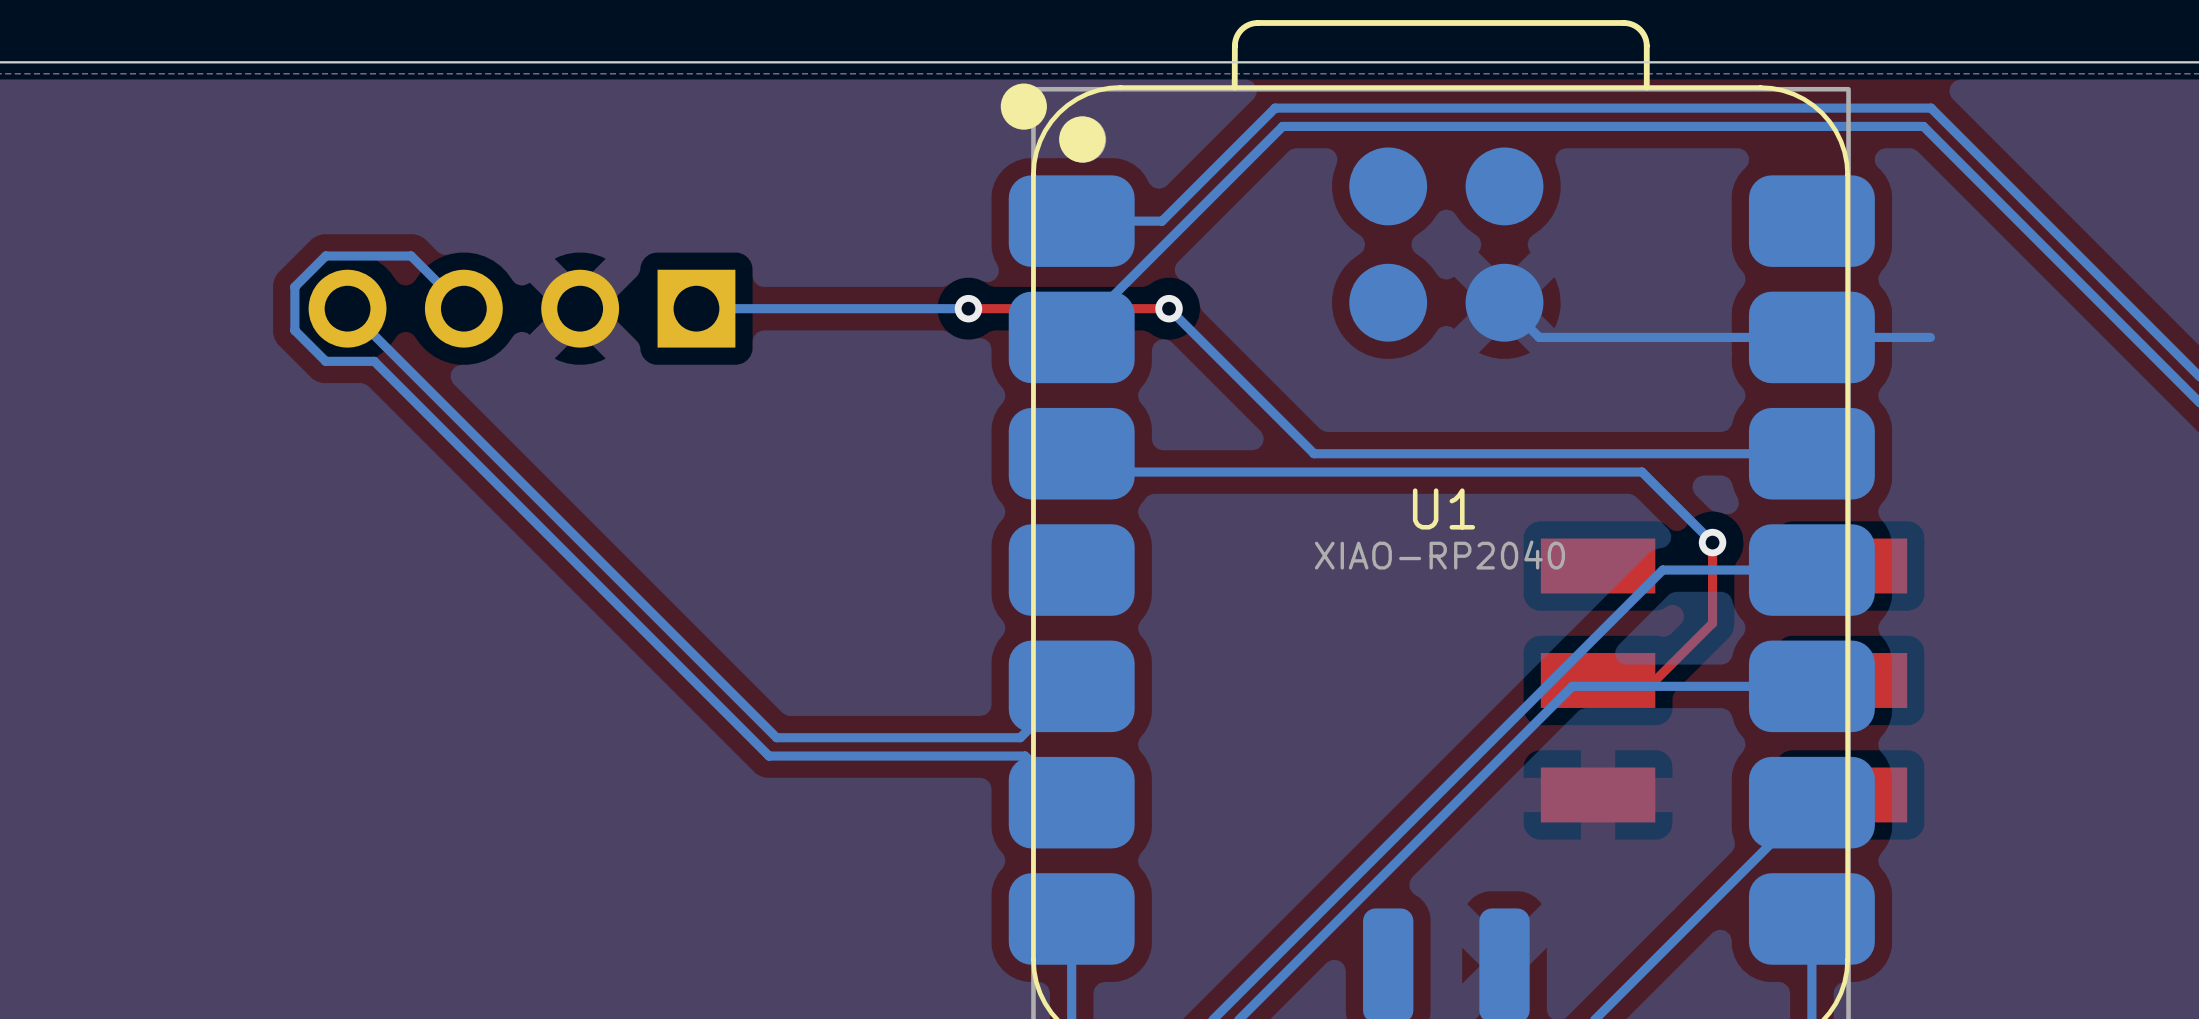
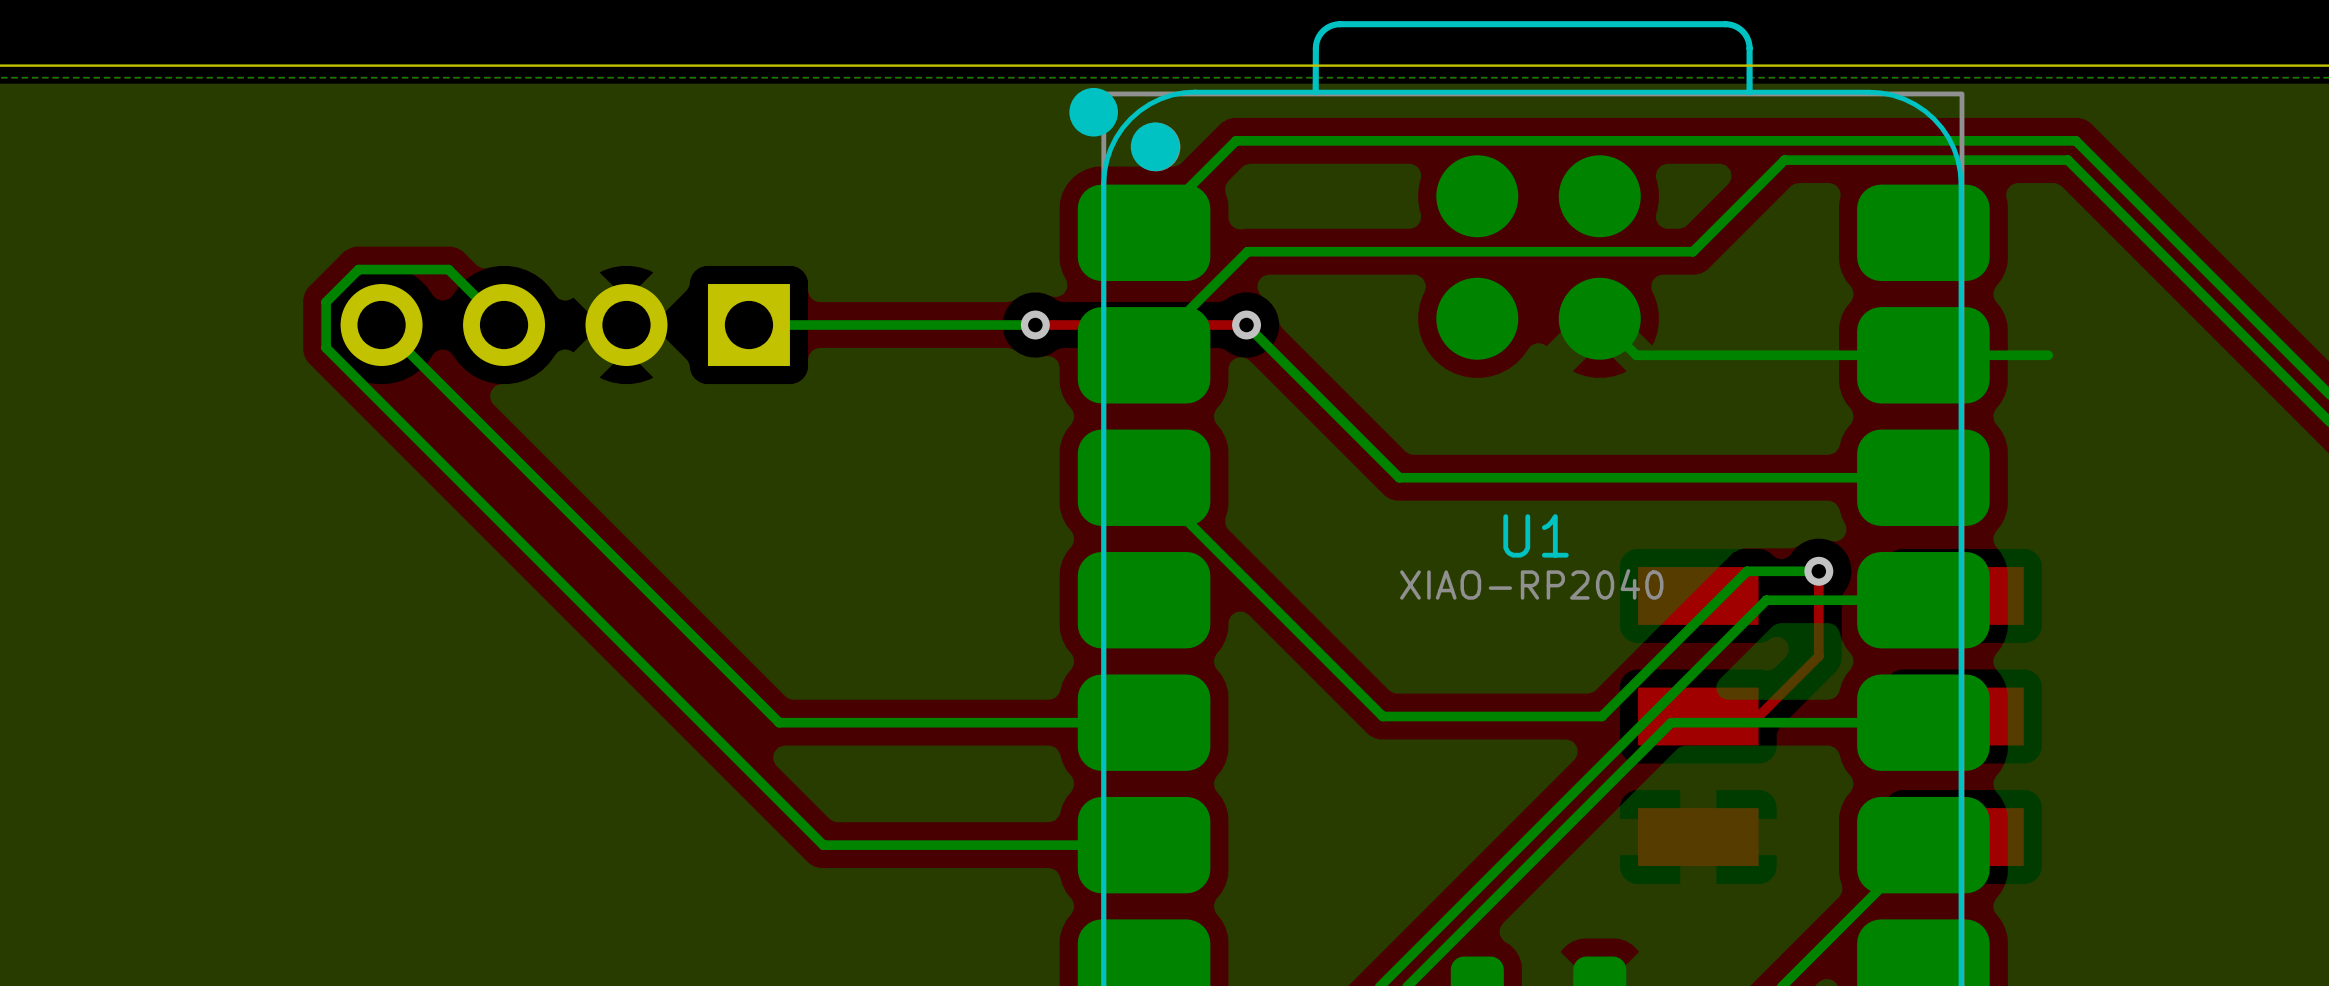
bottom track: (1956, 133) (1931, 108) (1275, 108) (1162, 221) (1071, 221) -> (2075, 140) (1236, 140) (1144, 232)
bottom track: (1949, 152) (1923, 126) (1282, 126) (1170, 239) -> (2067, 160) (1784, 160) (1692, 251) (1247, 251)
bottom track: (325, 361) (374, 361) (769, 756) (1025, 756) (1071, 802) -> (358, 380) (823, 845) (1144, 845)
bottom track: (1090, 472) (1642, 472) (1712, 542) -> (1163, 497) (1382, 716) (1601, 716) (1747, 571) (1818, 571)
bottom track: (1071, 686) (1020, 737) (776, 737) (725, 686) -> (1144, 722) (779, 722)

